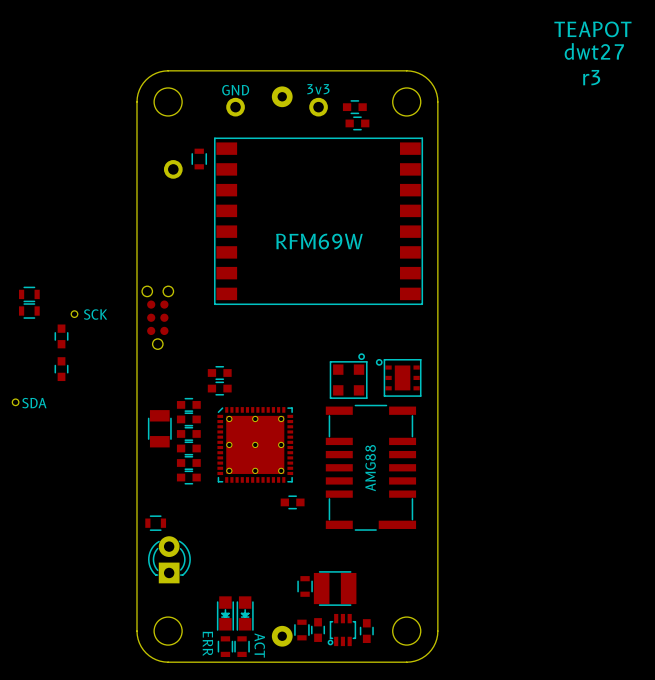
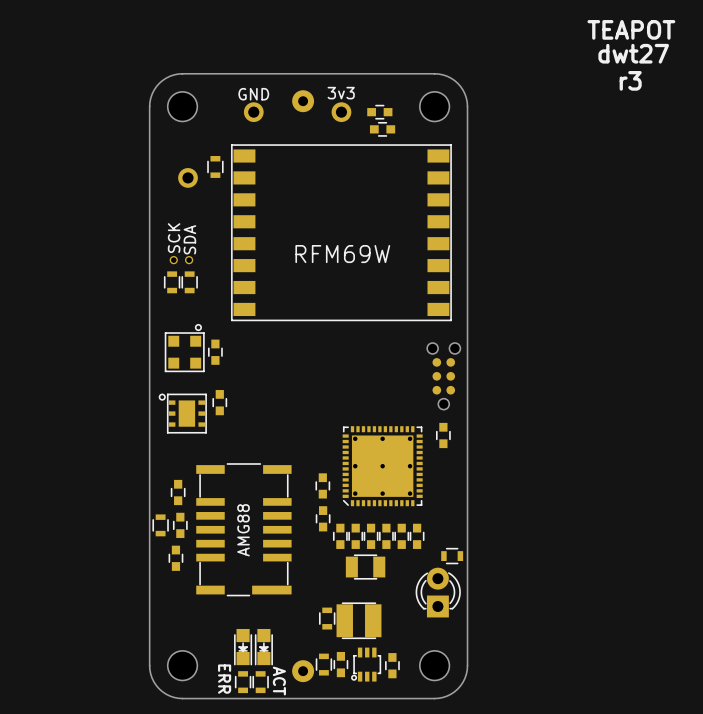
part: none -> (172, 282)
part: none -> (189, 282)
part: (29, 294) -> none
part: (29, 311) -> none
part position: (74, 314) -> (173, 260)
part value rotation: 0° (95, 314) -> 90° counterclockwise (174, 238)
part: (157, 317) -> none
part: none -> (215, 352)
part: (61, 336) -> none
part: none -> (443, 376)
part: (61, 369) -> none
part: (219, 373) -> none
part position: (348, 376) -> (184, 348)
part position: (398, 377) -> (182, 413)
part: none -> (219, 402)
part: (219, 388) -> none
part position: (15, 402) -> (189, 260)
part value rotation: 0° (34, 403) -> 90° counterclockwise (189, 239)
part: (188, 404) -> none
part: none -> (443, 435)
part: (188, 419) -> none
part rotation: 0° (159, 428) -> 90° clockwise (365, 567)
part position: (159, 428) -> (365, 567)
part: (188, 433) -> none
part rotation: 0° (255, 444) -> 90° counterclockwise (382, 466)
part position: (255, 444) -> (382, 466)
part: (188, 448) -> none
part: none -> (322, 485)
part: (188, 463) -> none
part: none -> (178, 492)
part position: (370, 467) -> (243, 529)
part: (188, 477) -> none
part: none -> (323, 518)
part: none -> (160, 525)
part: none -> (180, 525)
part: (292, 502) -> none
part: none -> (340, 536)
part: none -> (355, 536)
part: none -> (371, 536)
part: none -> (386, 536)
part: none -> (401, 536)
part: none -> (417, 536)
part footprint: [145, 515, 167, 531] -> [168, 545, 184, 571]
part: none -> (452, 556)
part position: (169, 559) -> (438, 592)

